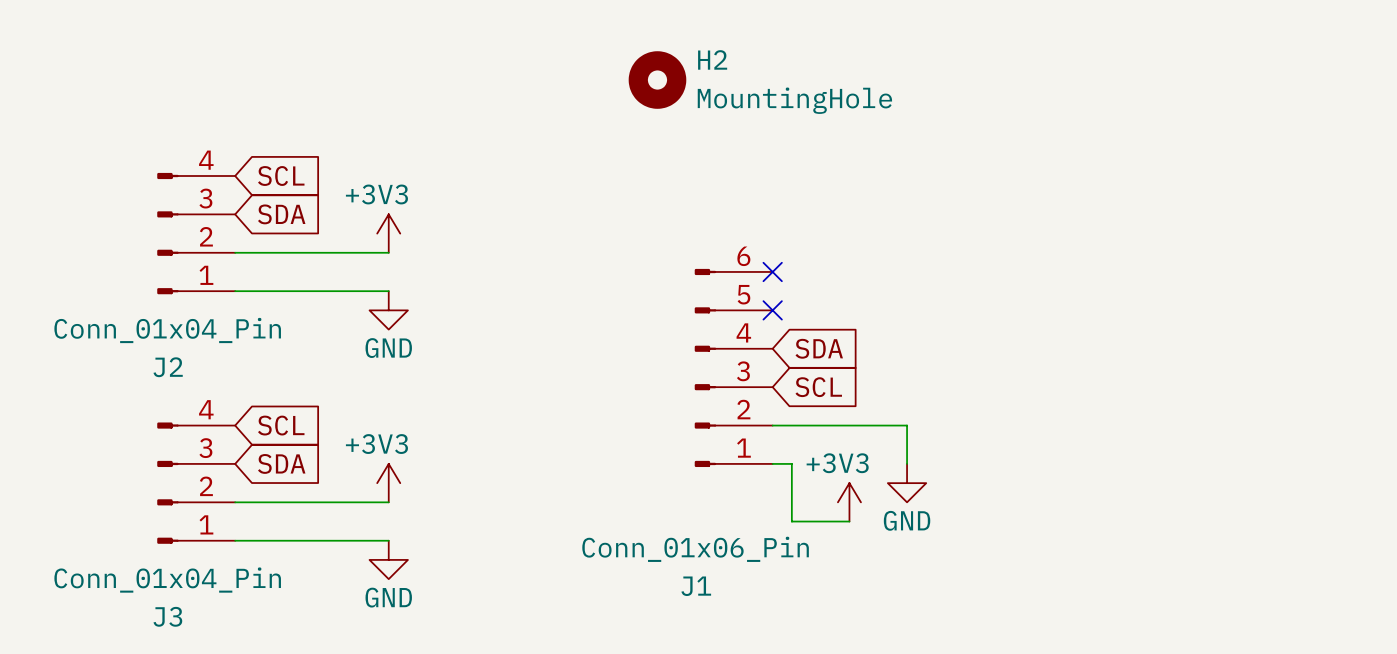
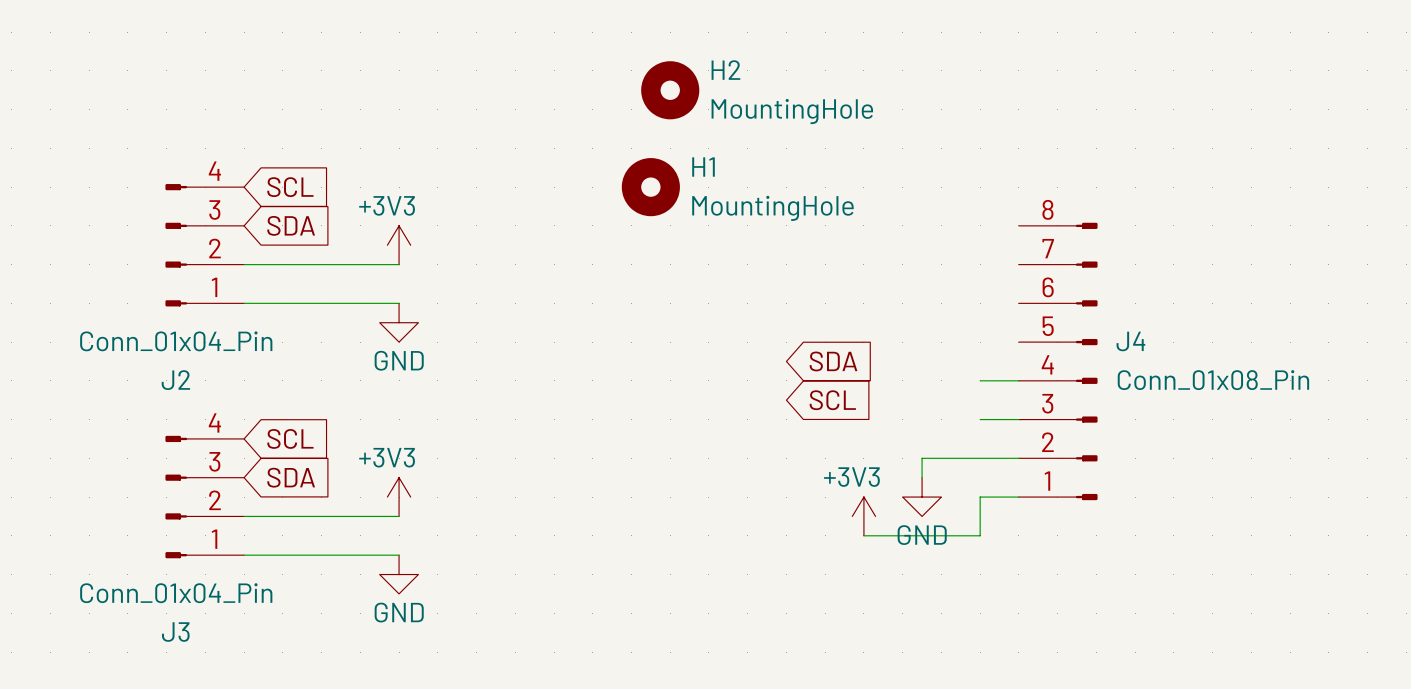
H1: none -> MountingHole (650, 187)
no-connect mark: (772, 271) -> none
no-connect mark: (772, 310) -> none
J4: none -> Conn_01x08_Pin (1058, 361)
J1: Conn_01x06_Pin (733, 367) -> none
wire: none -> (980, 380) (1018, 380)
wire: none -> (980, 419) (1018, 419)
wire: (772, 425) (907, 425) (907, 444) -> (1018, 458) (922, 458)
wire: (772, 463) (791, 463) (791, 521) (849, 521) -> (1018, 497) (980, 497) (980, 535) (863, 535)

